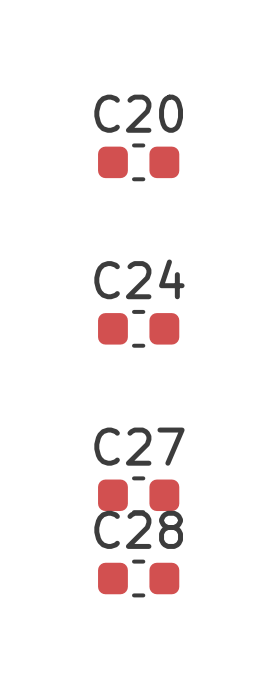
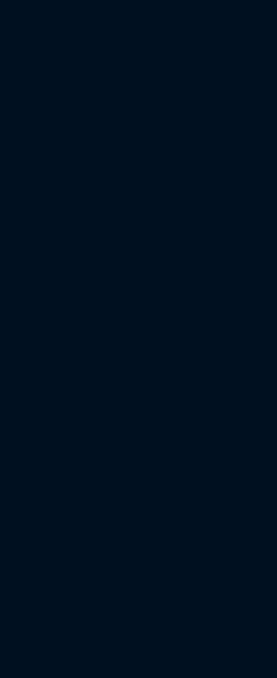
C20: (138, 162) -> none
C24: (138, 328) -> none
C27: (138, 495) -> none
C28: (138, 578) -> none

